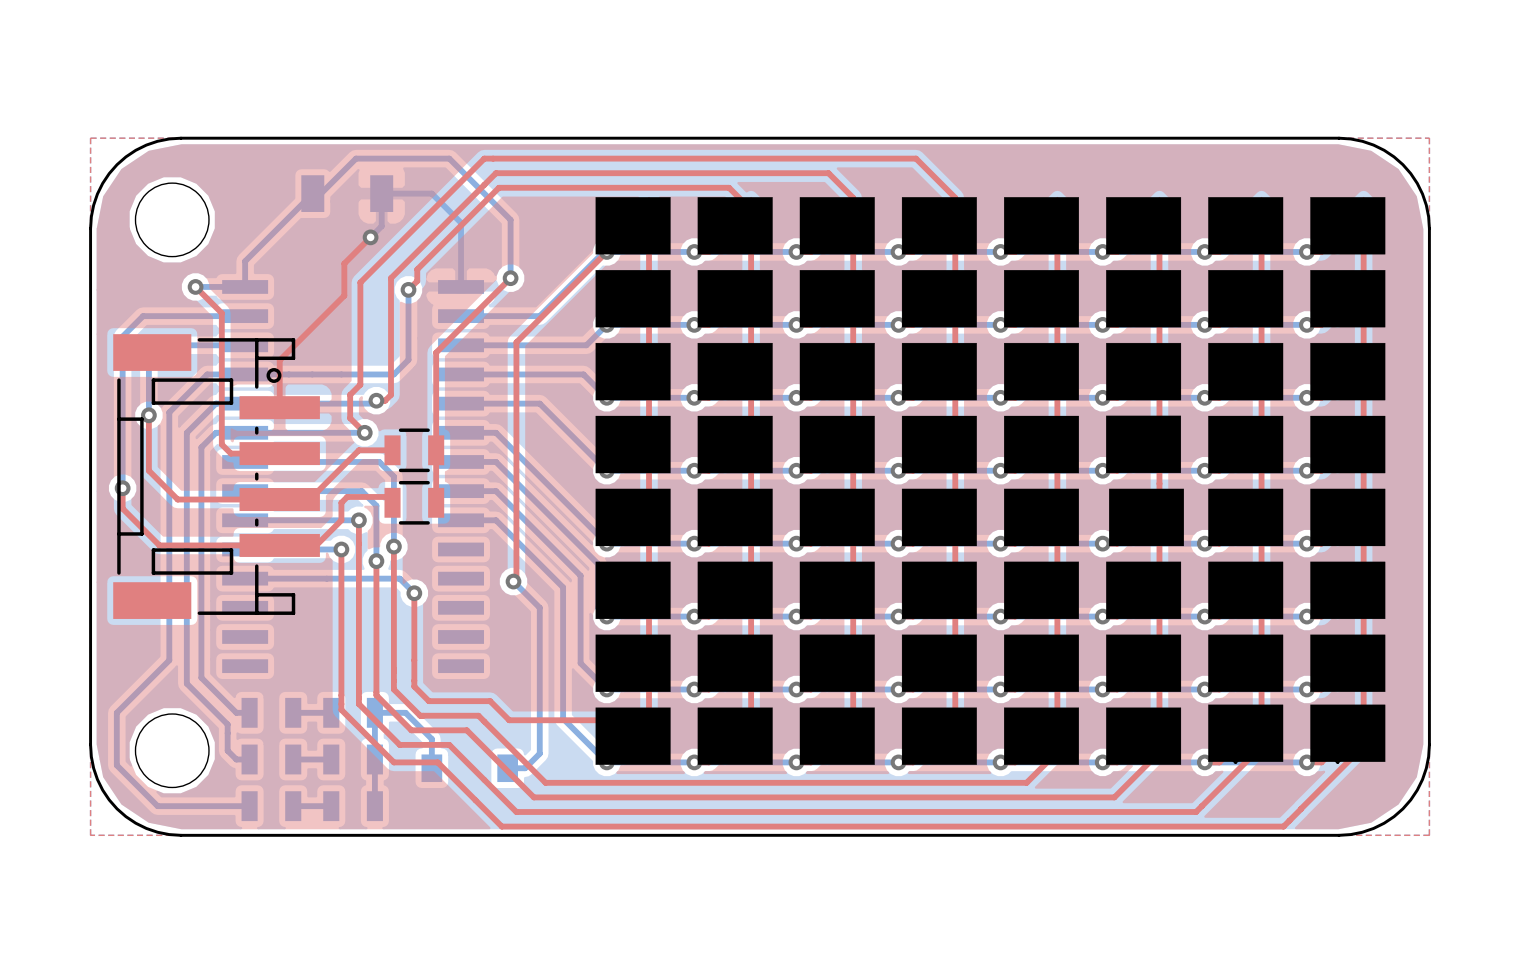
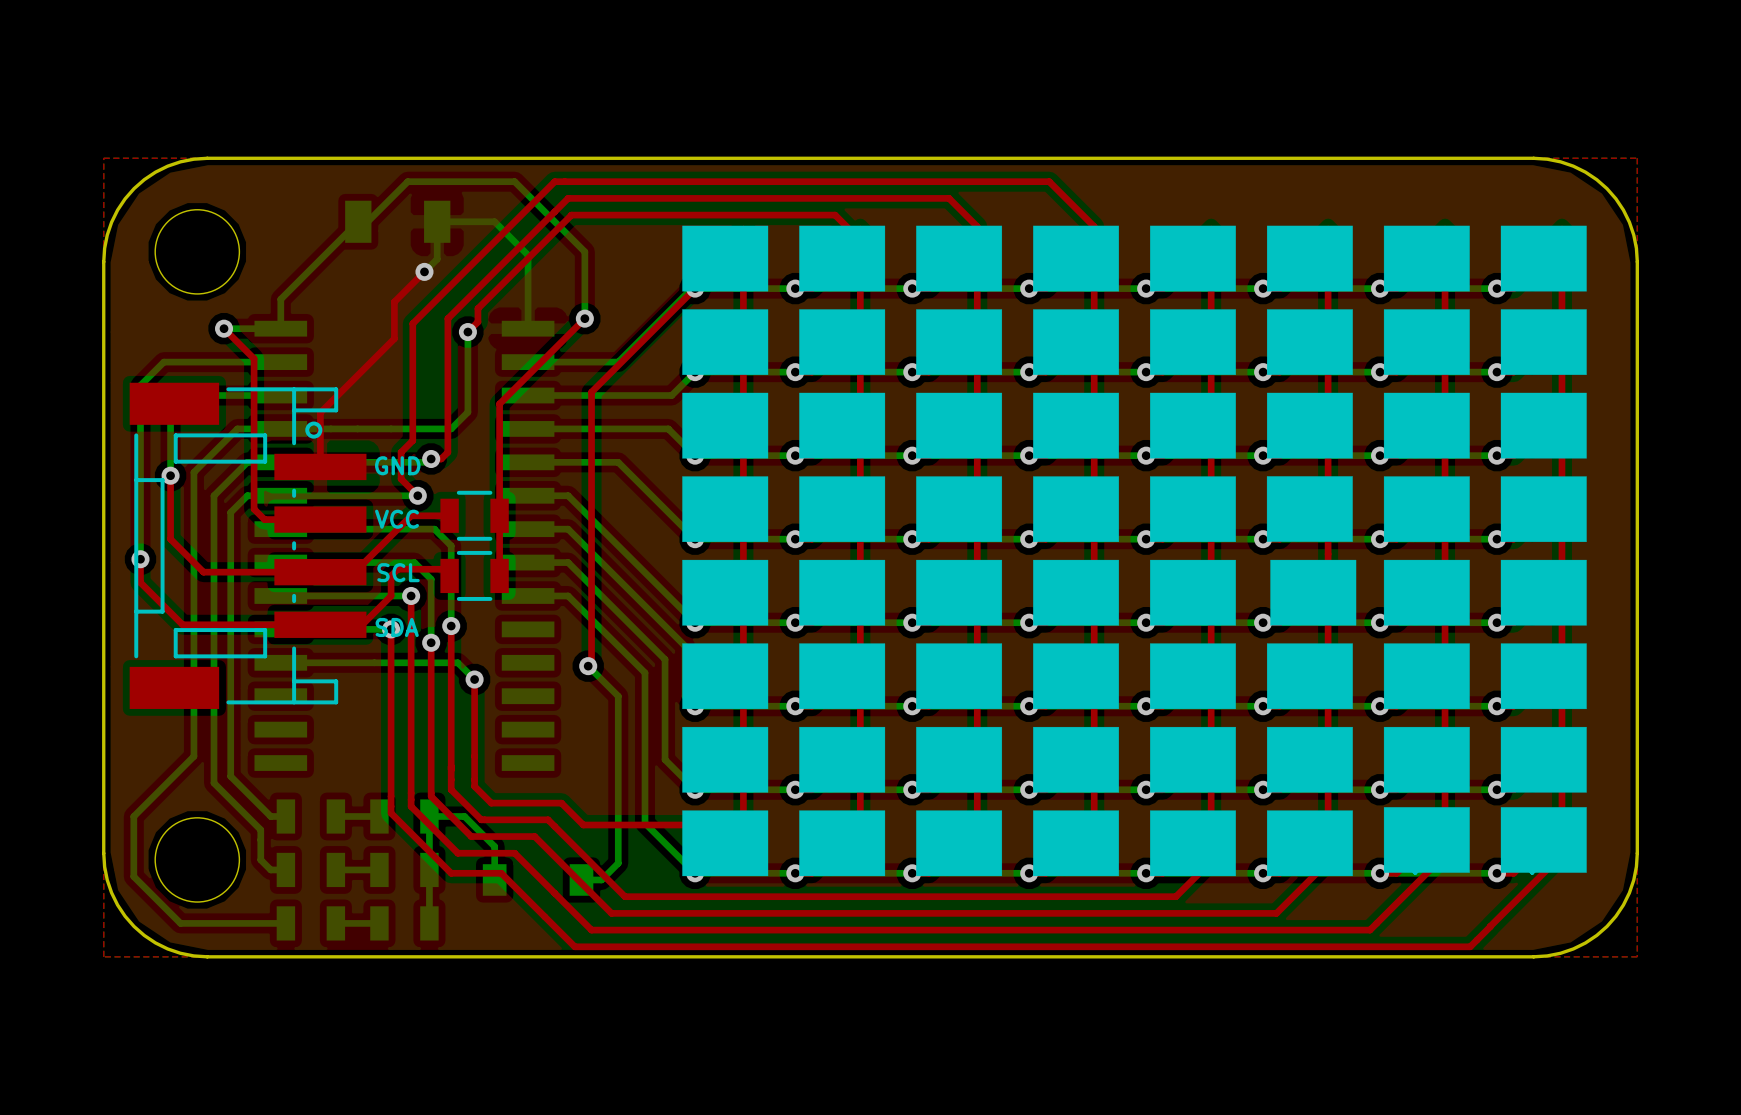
text: none -> GND (397, 465)
text: none -> VCC (397, 519)
text: none -> SCL (398, 572)
text: none -> SDA (397, 627)

